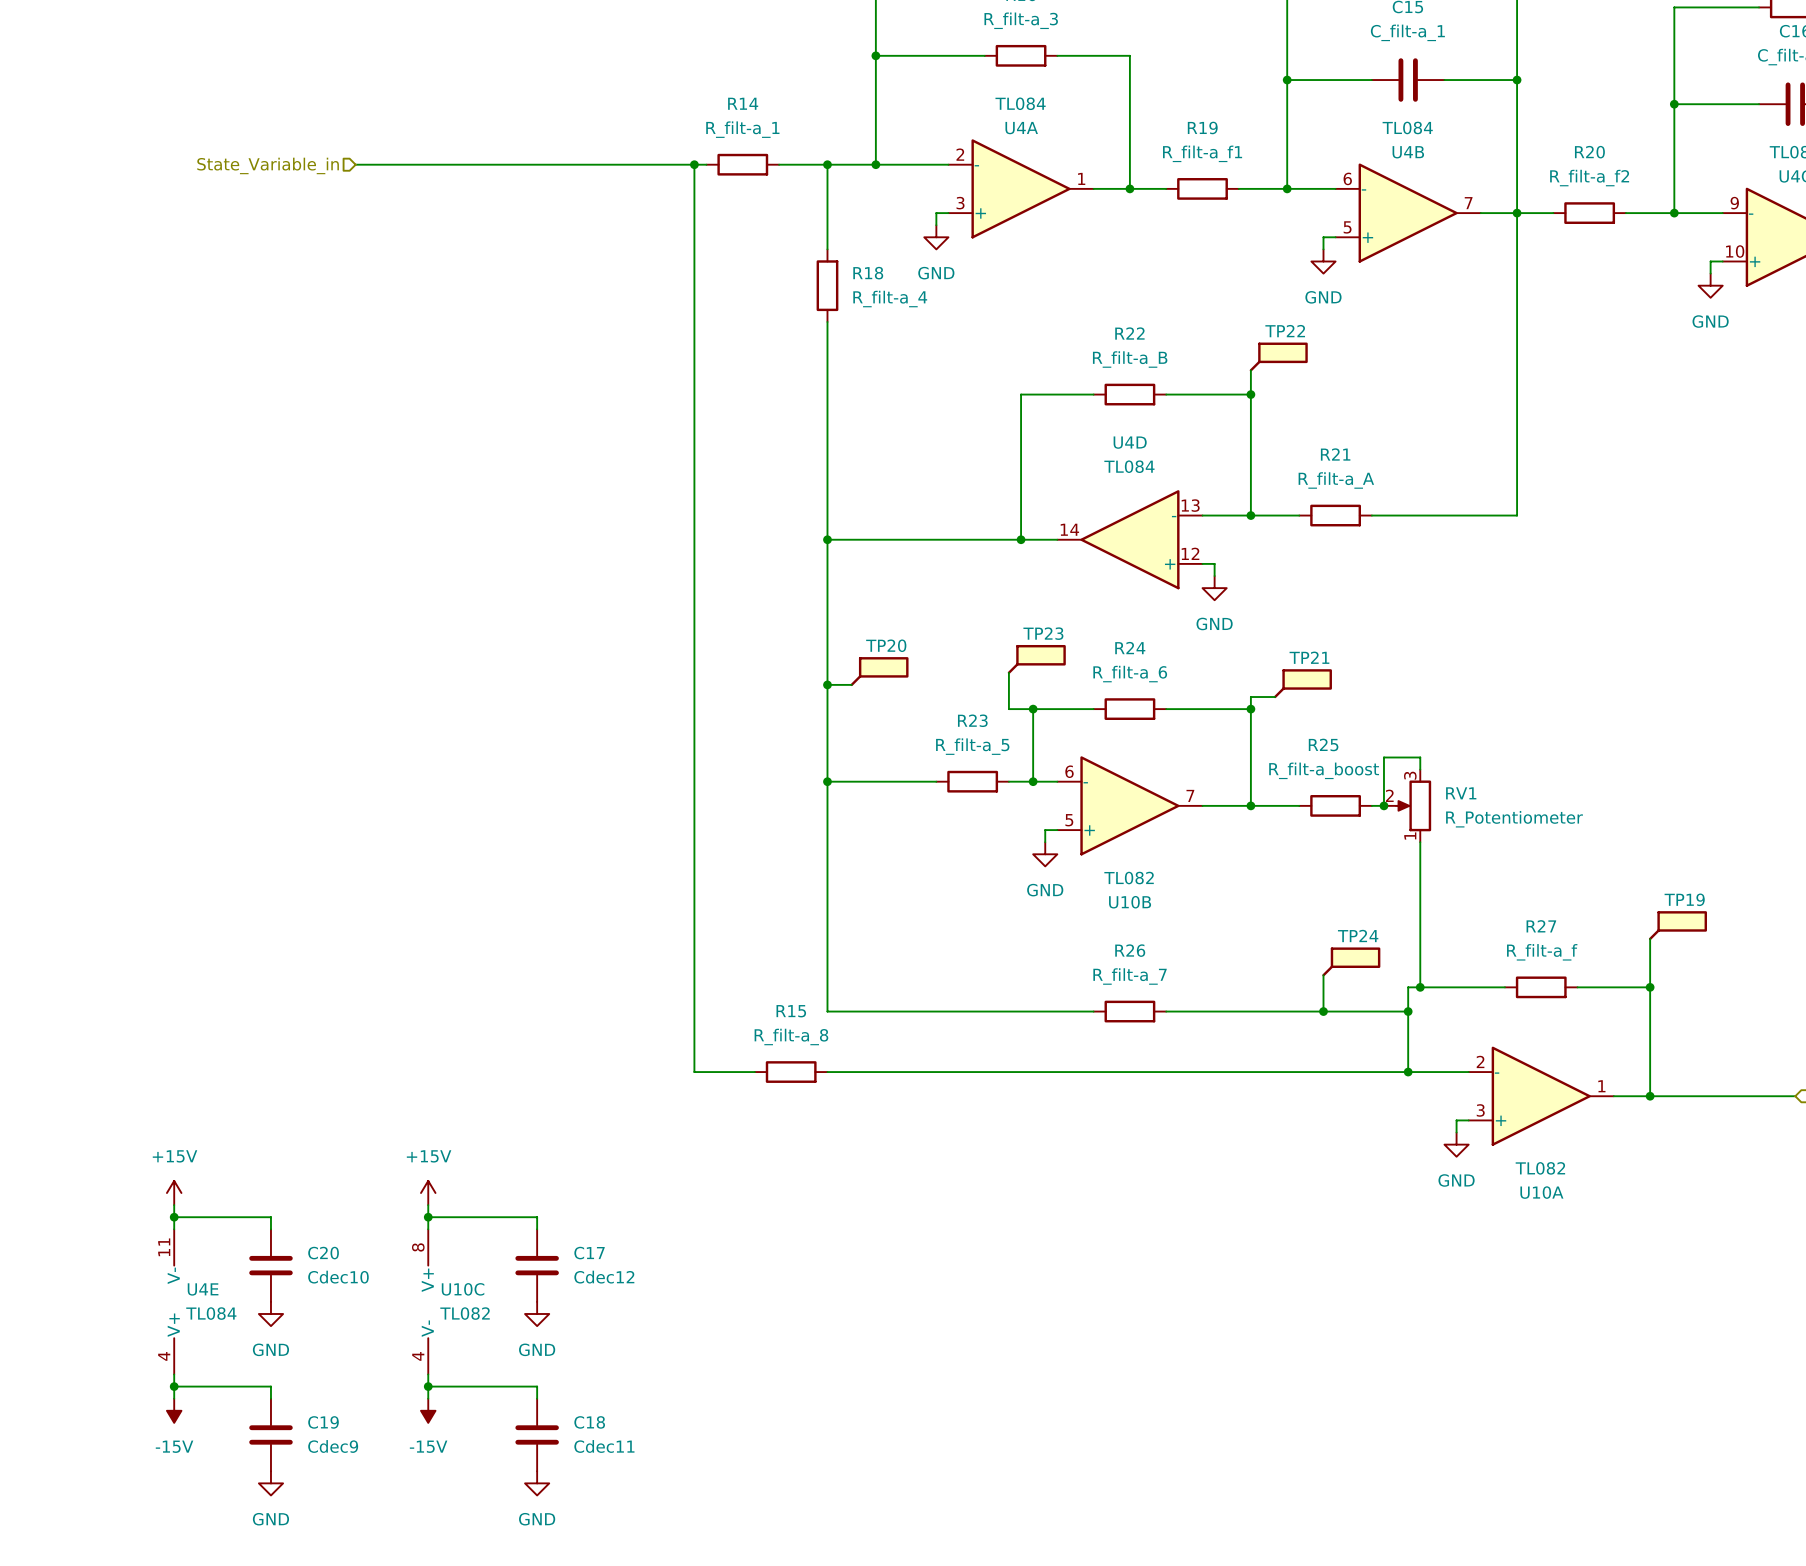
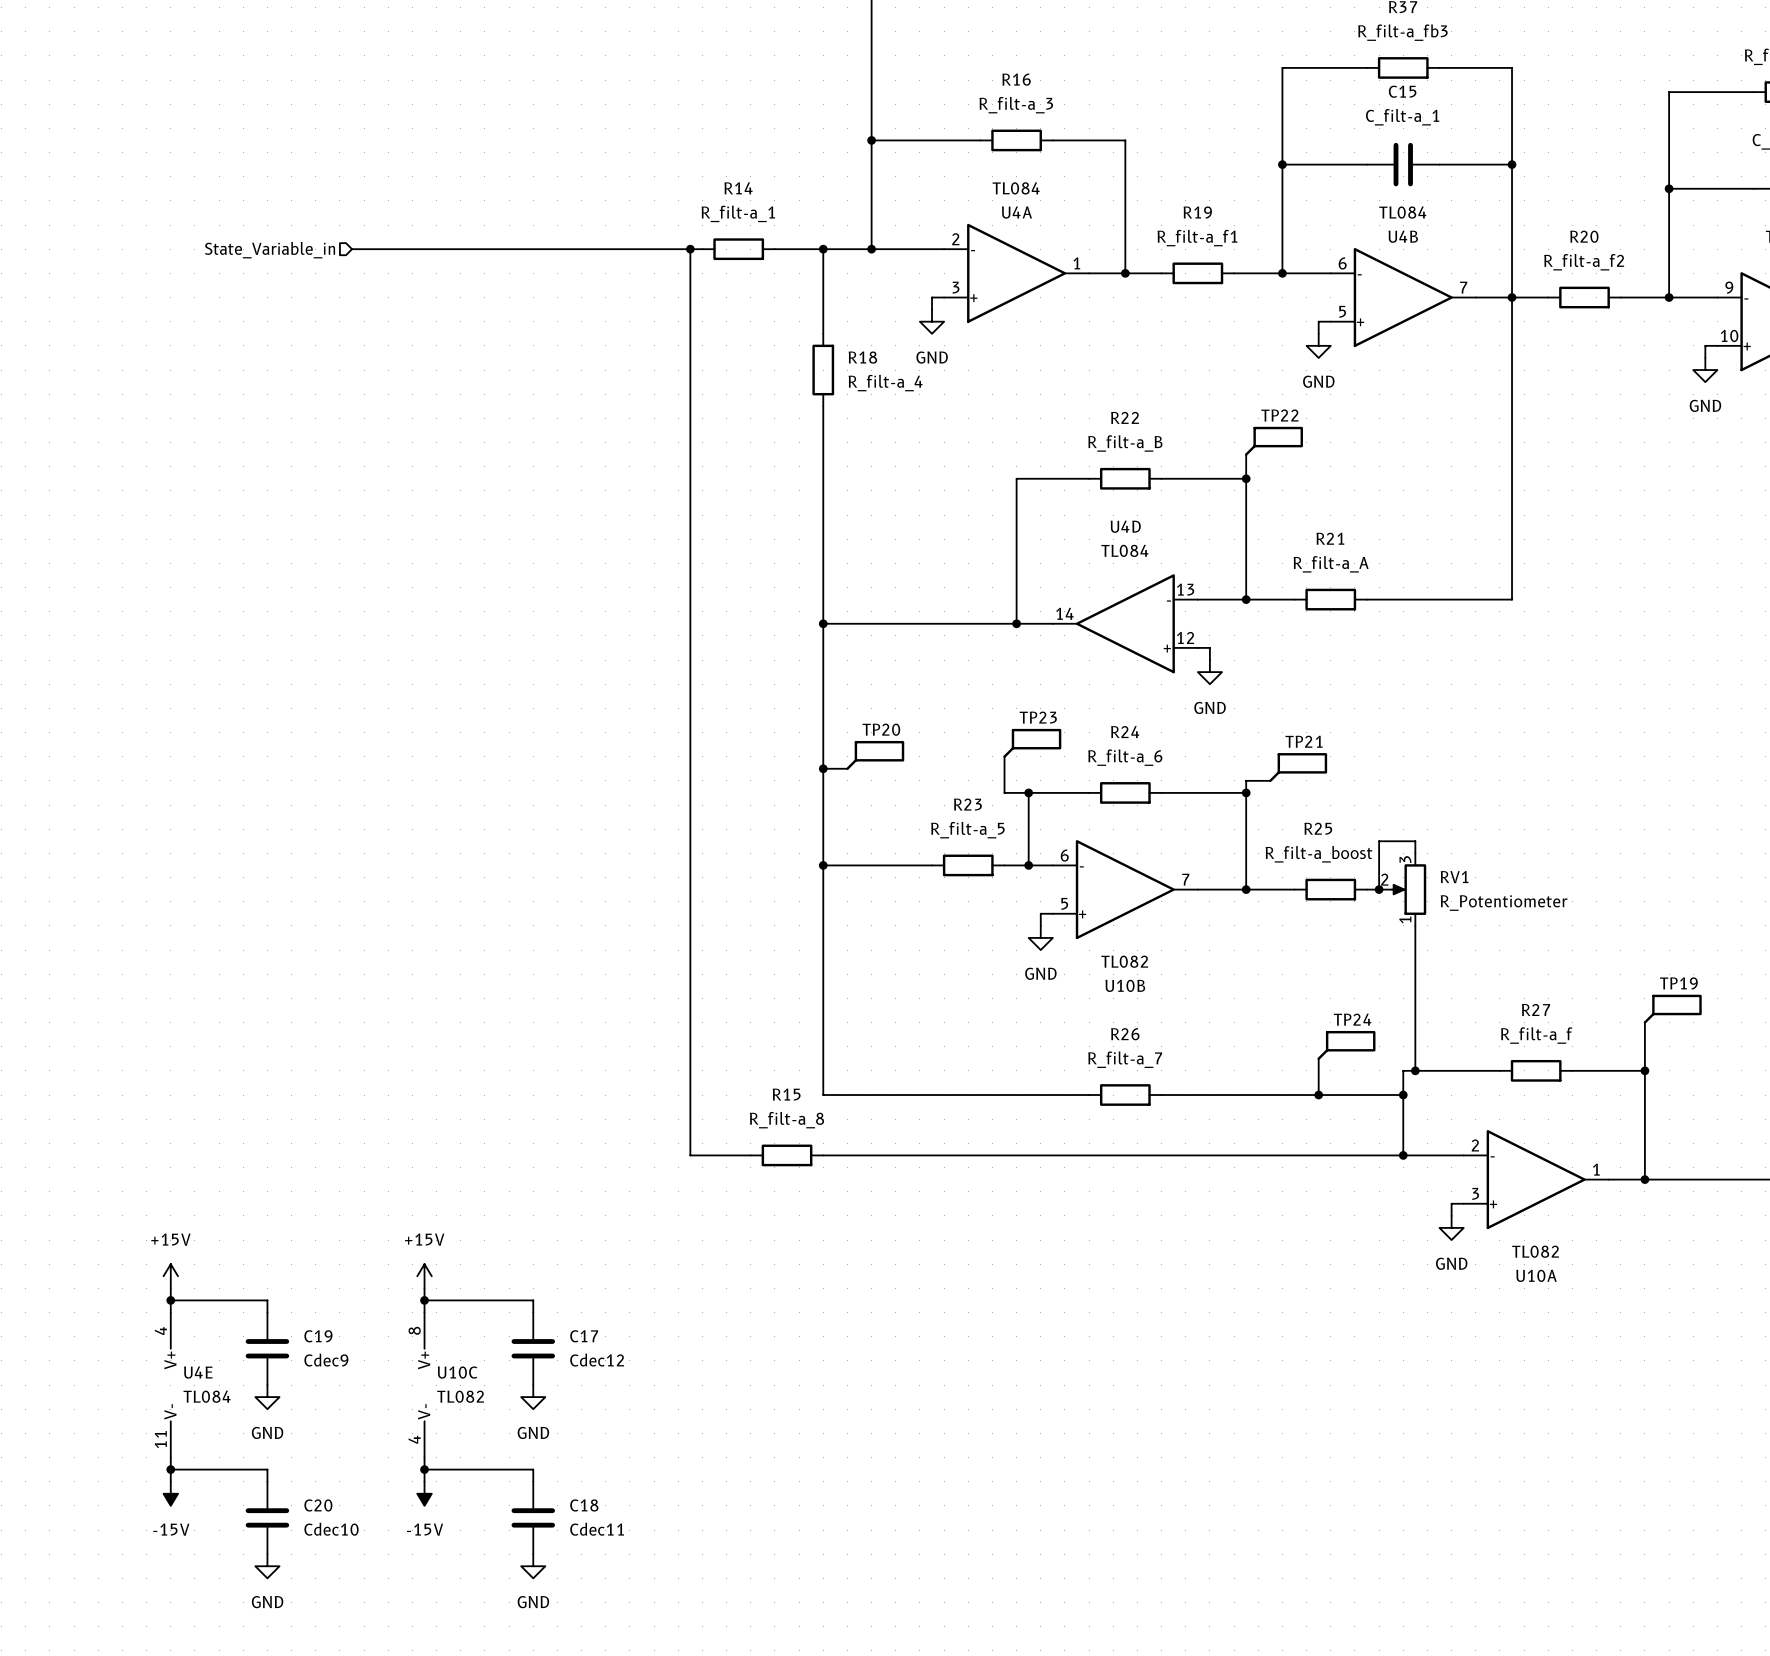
C20 name: C20 (323, 1253) -> C19 (318, 1336)
C20 value: Cdec10 (338, 1277) -> Cdec9 (326, 1360)
U4E rotation: 0° (174, 1301) -> 180° (170, 1385)
C19 name: C19 (323, 1422) -> C20 (318, 1505)
C19 value: Cdec9 (333, 1446) -> Cdec10 (331, 1529)

